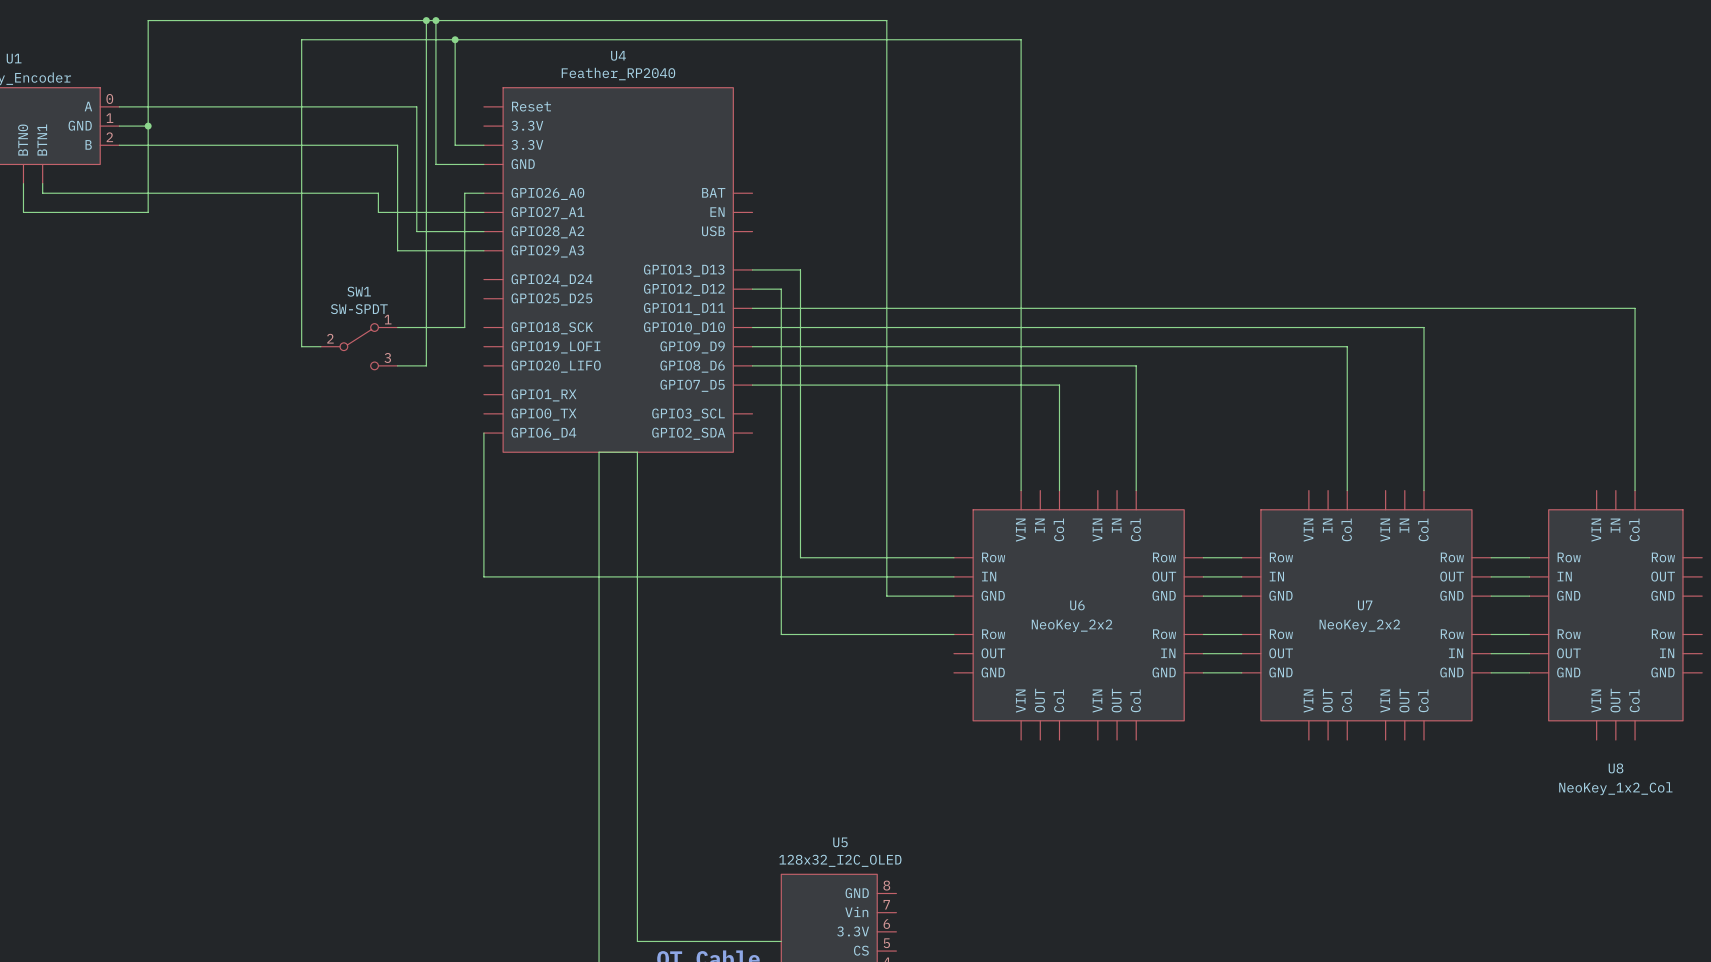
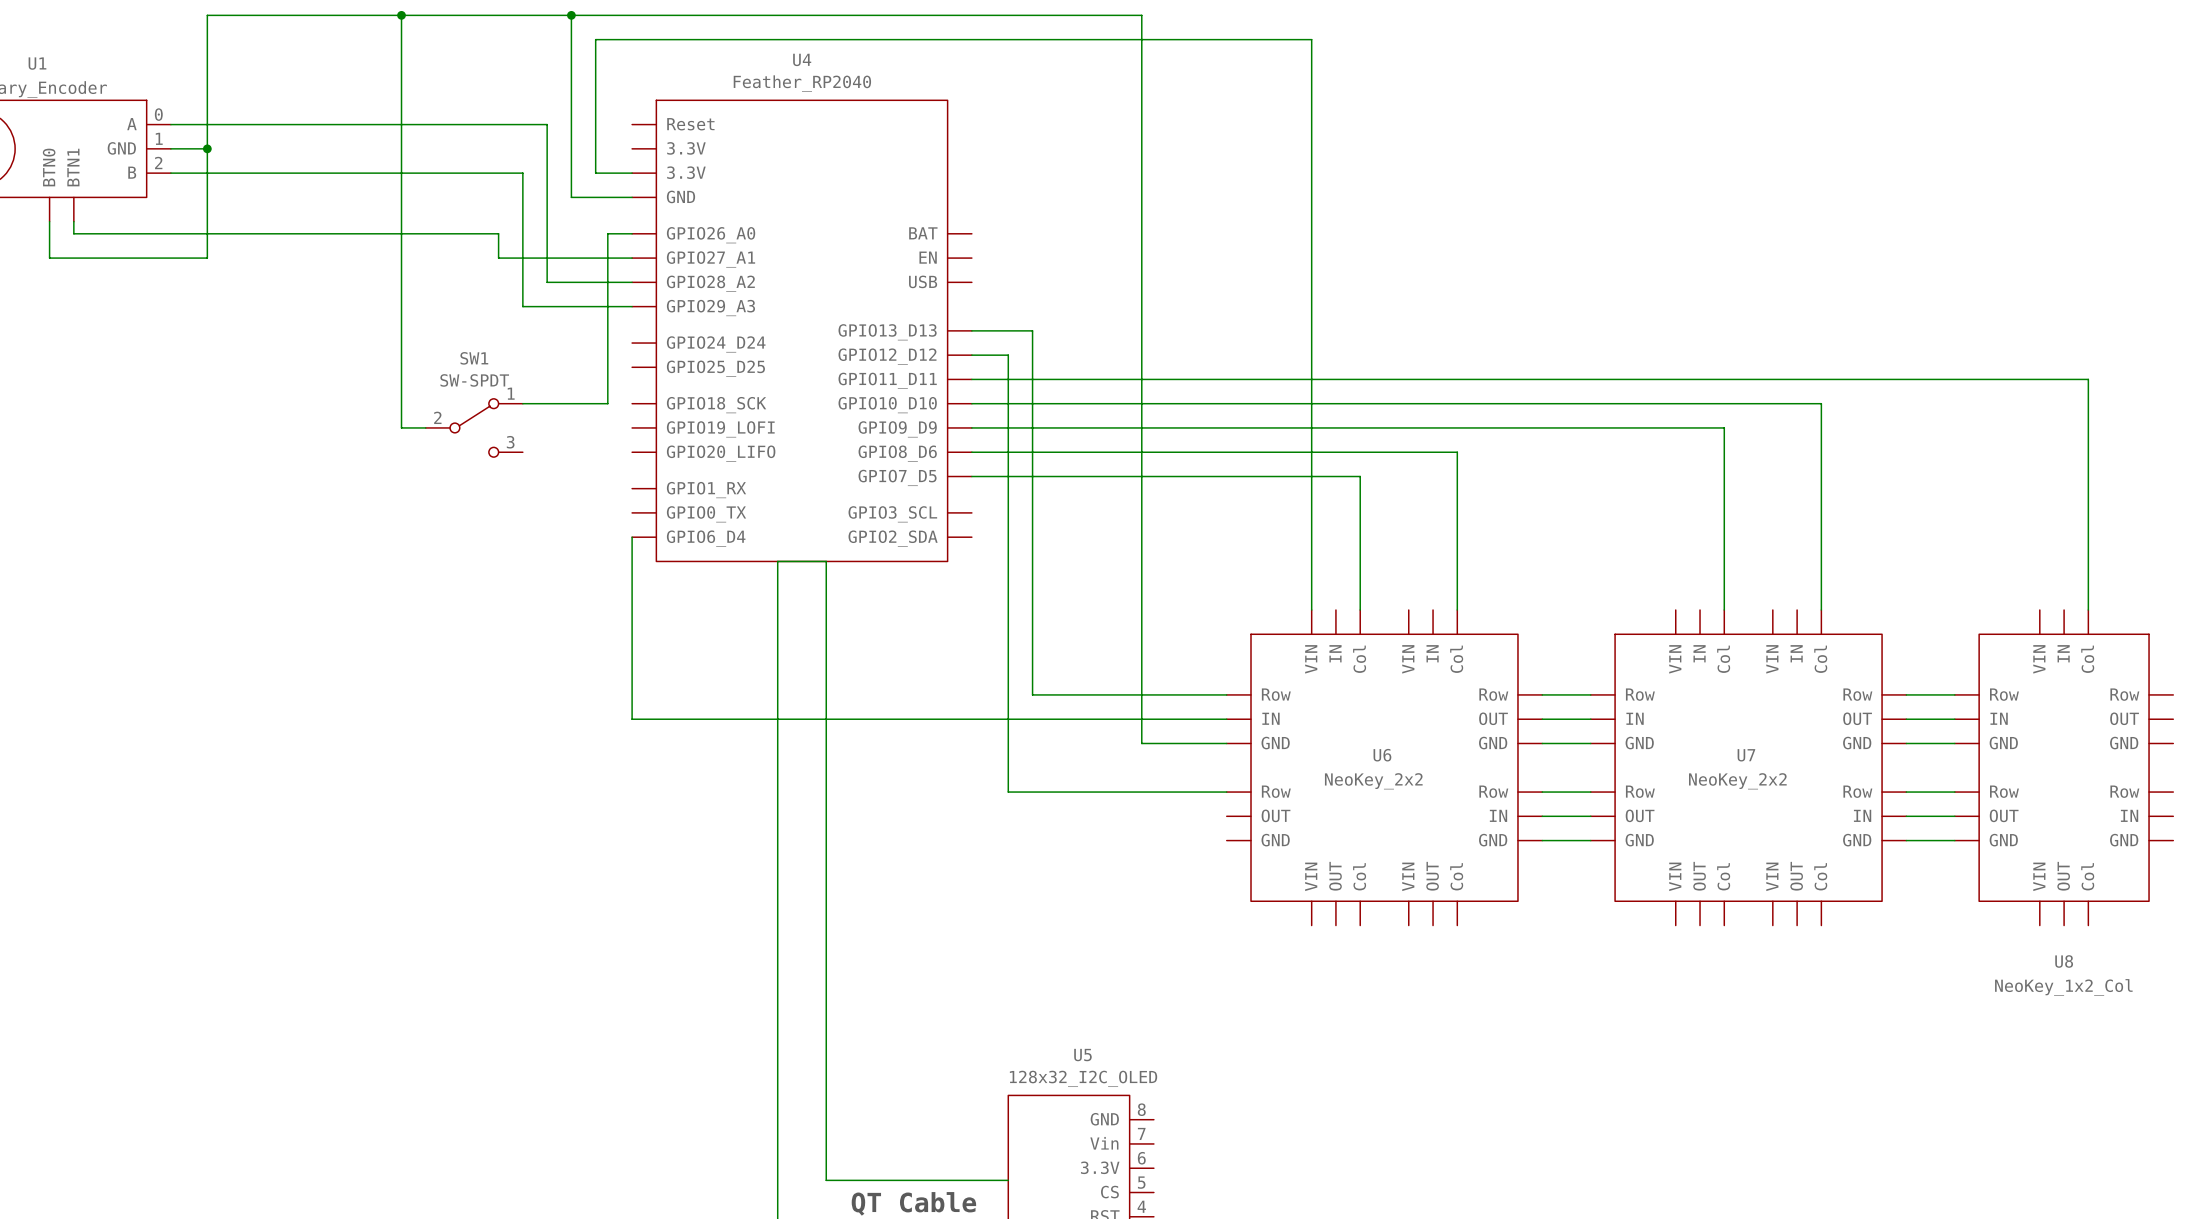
junction: none -> (401, 15)
wire: (426, 20) (426, 365) (397, 365) -> none
junction: (426, 20) -> none
wire: (301, 39) (455, 39) -> (401, 39) (401, 15)
junction: (455, 39) -> none

